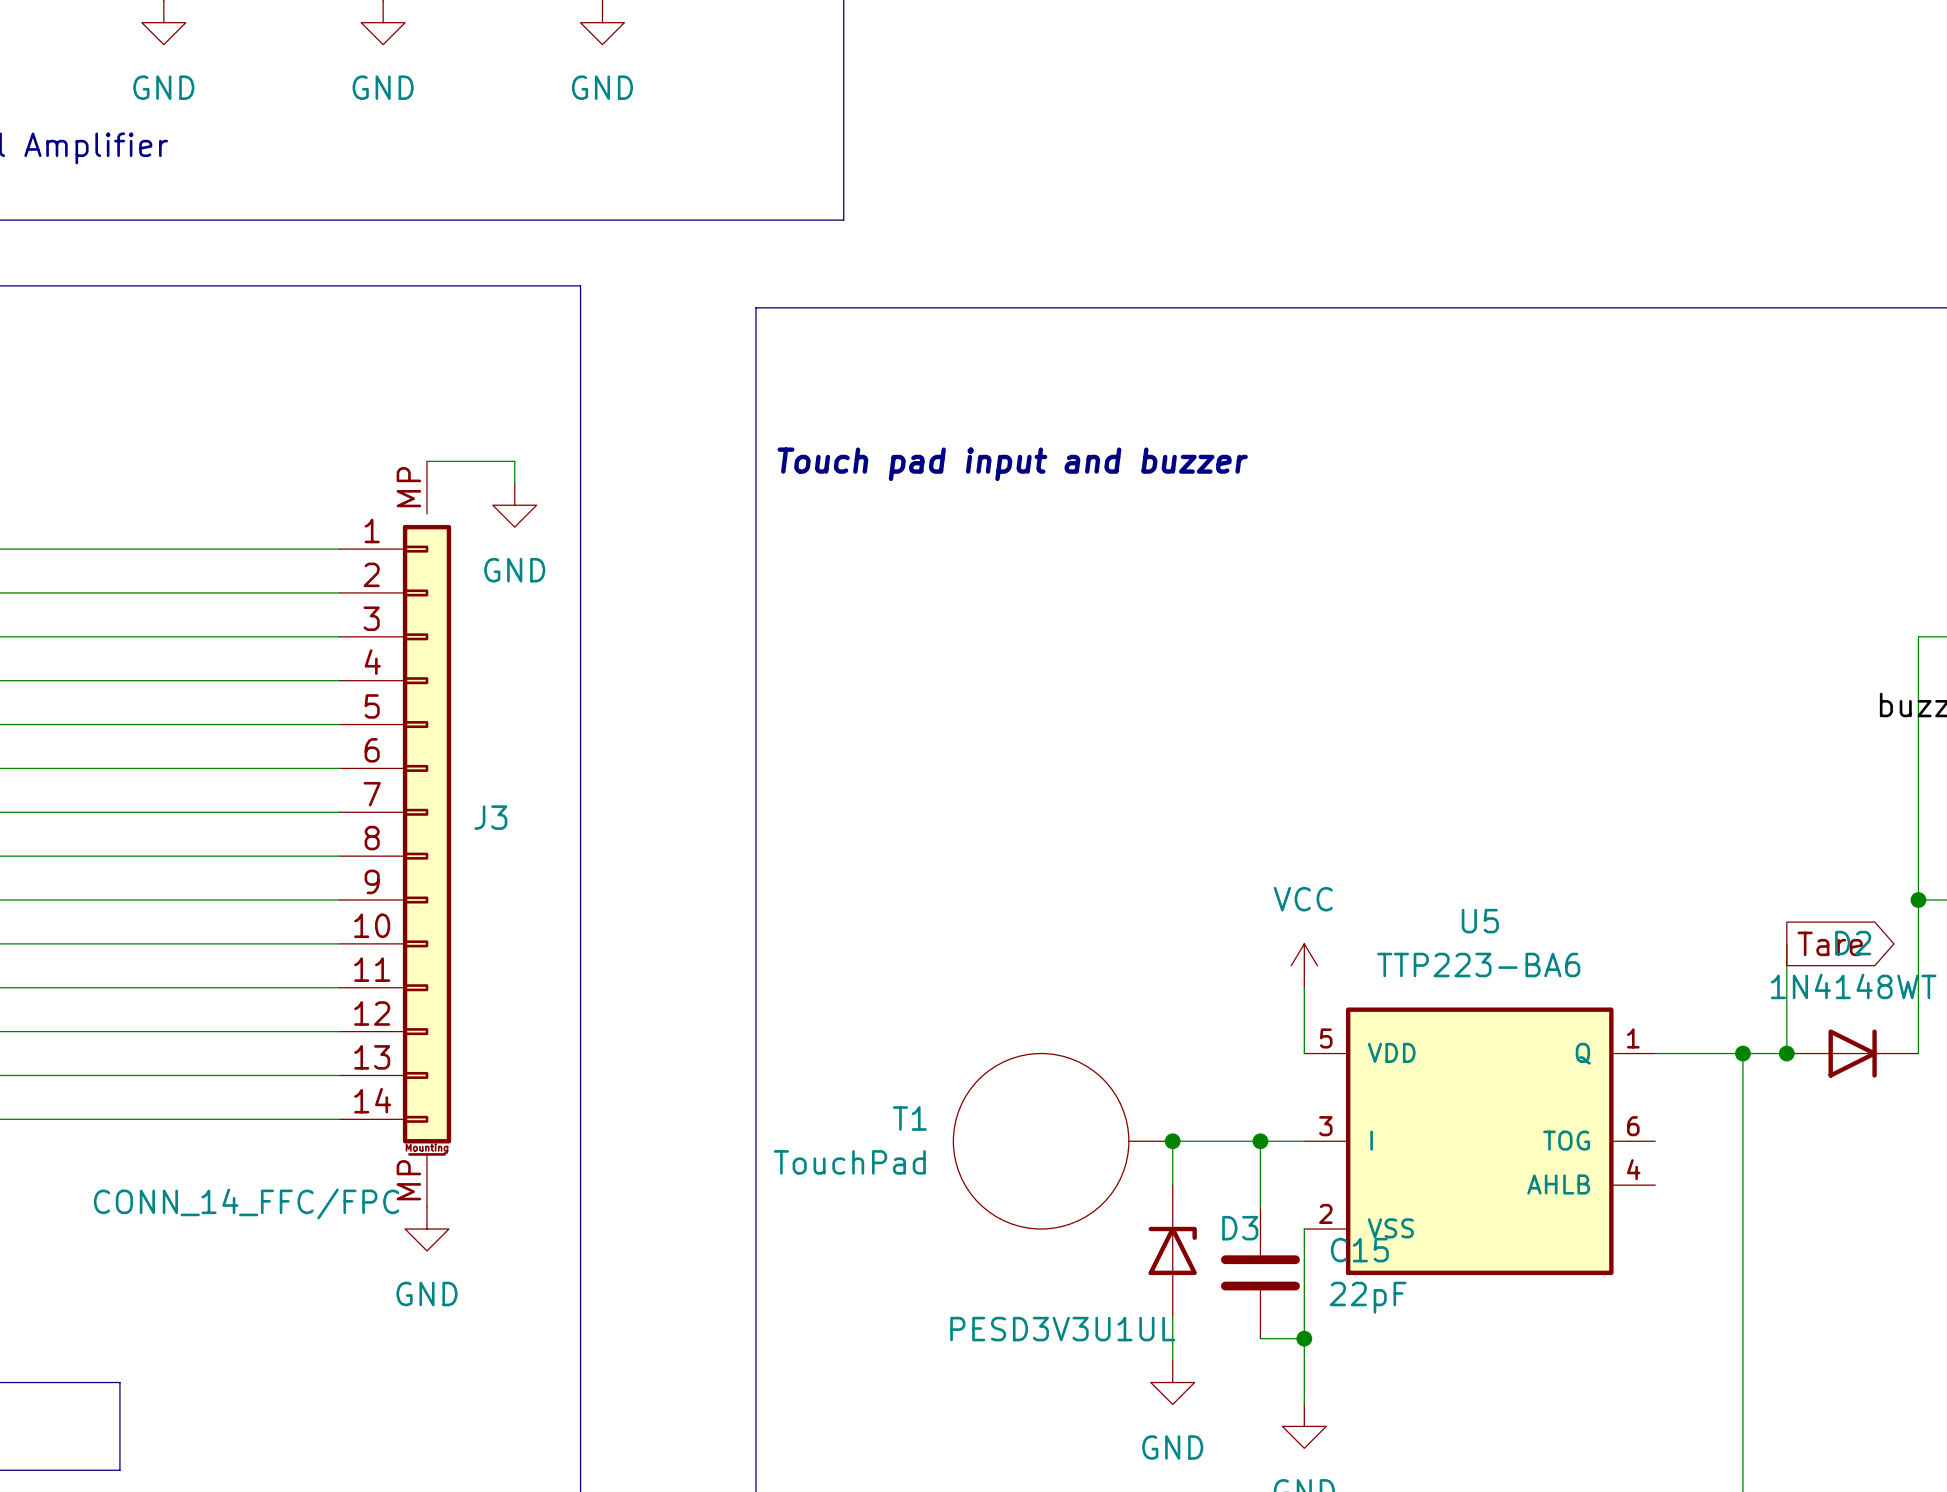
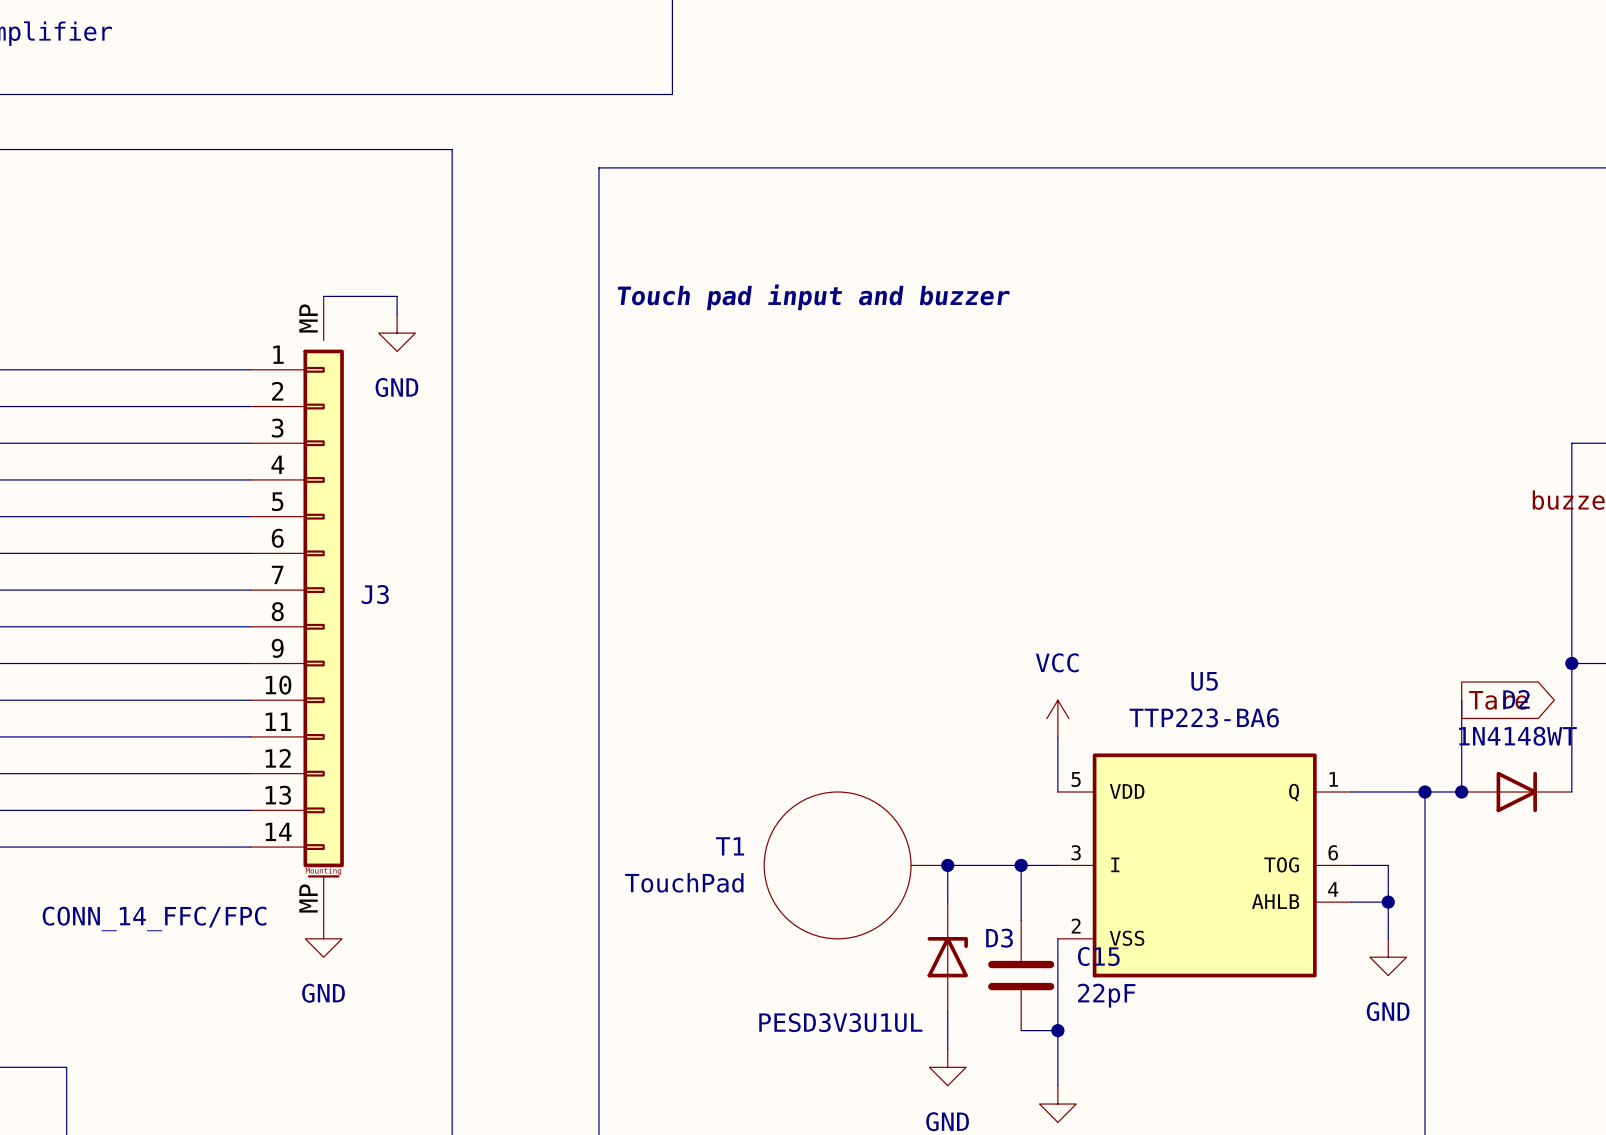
wire: none -> (1351, 865) (1388, 865) (1388, 938)
wire: none -> (1351, 902) (1388, 902)
junction: none -> (1388, 902)
power symbol: none -> GND (1388, 957)

